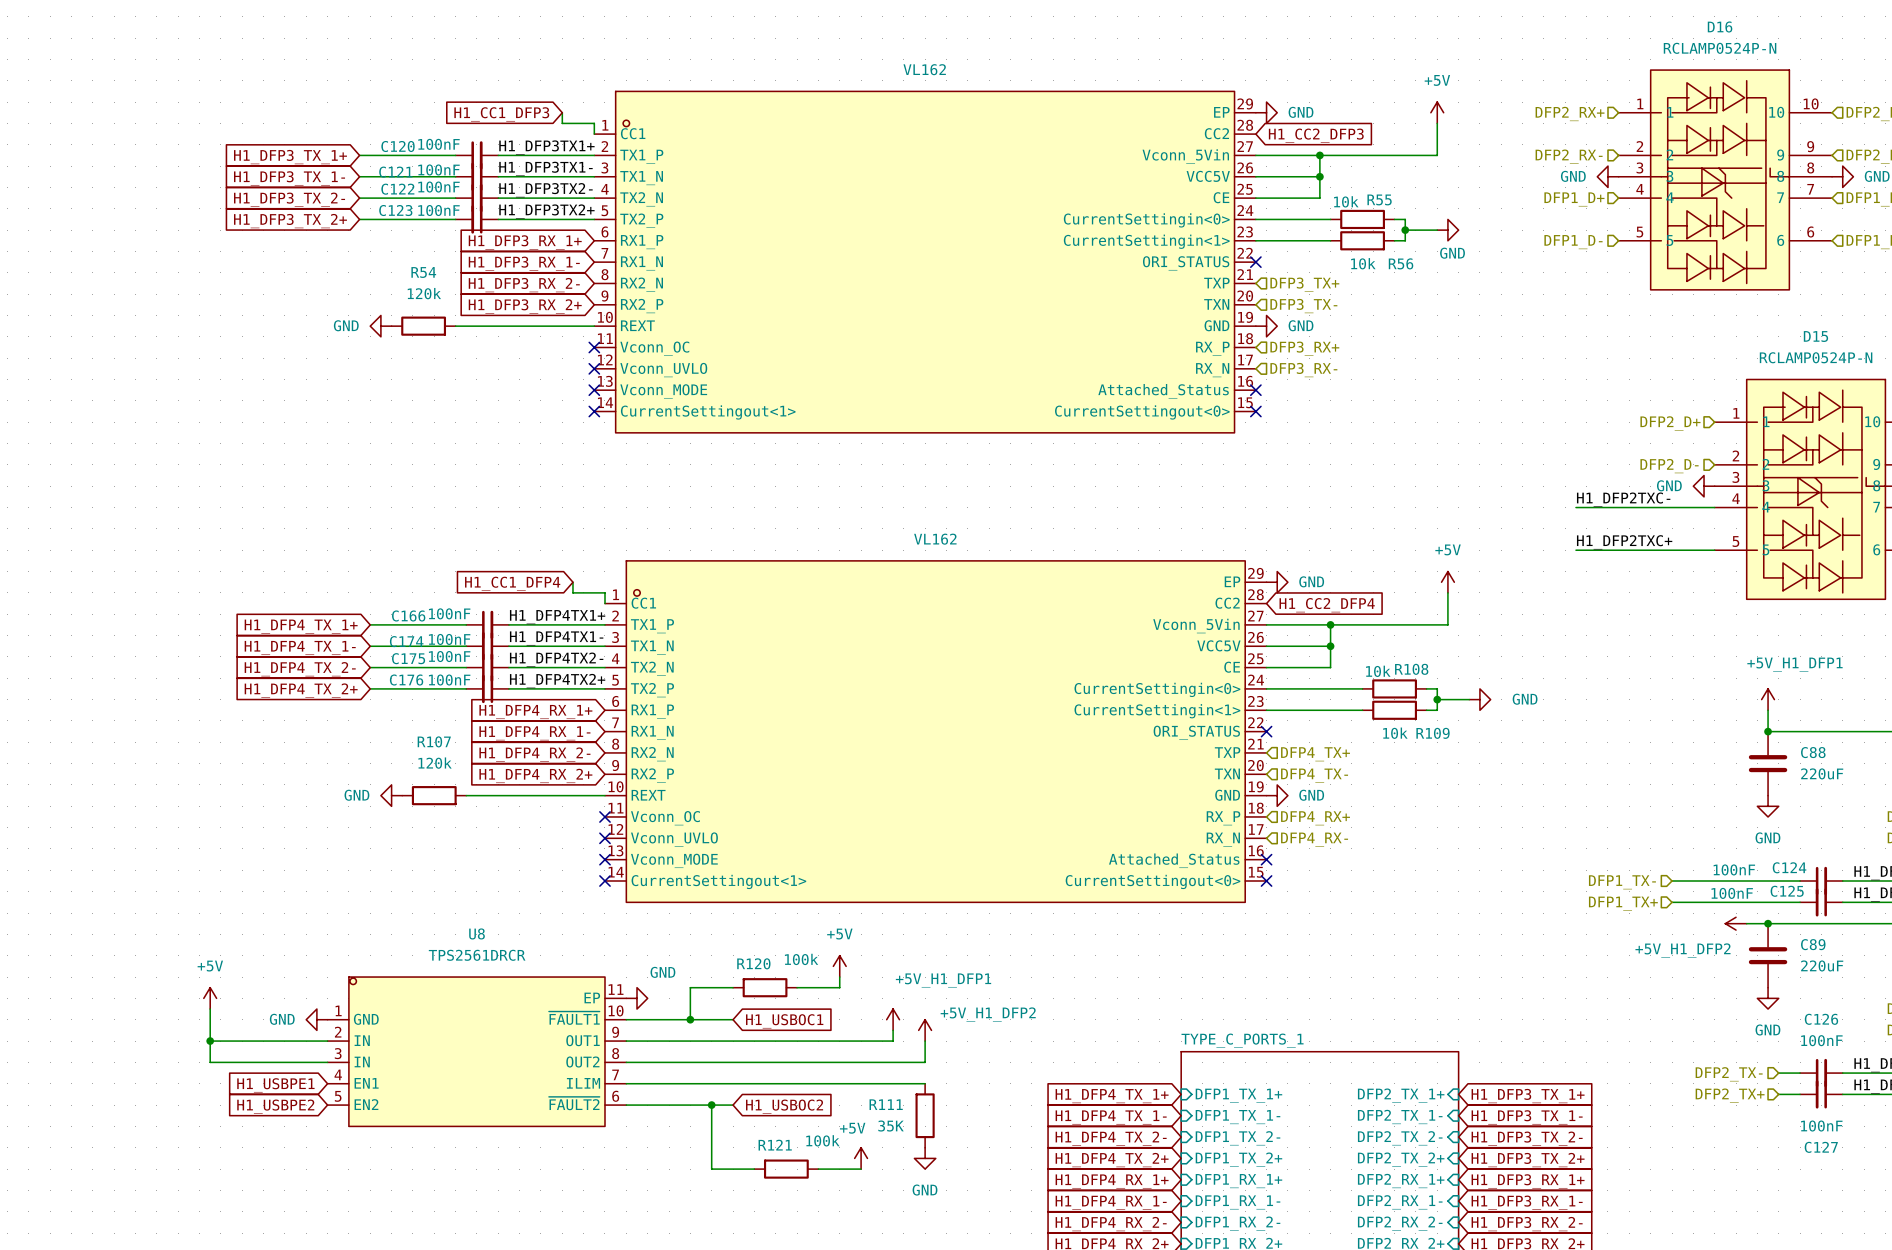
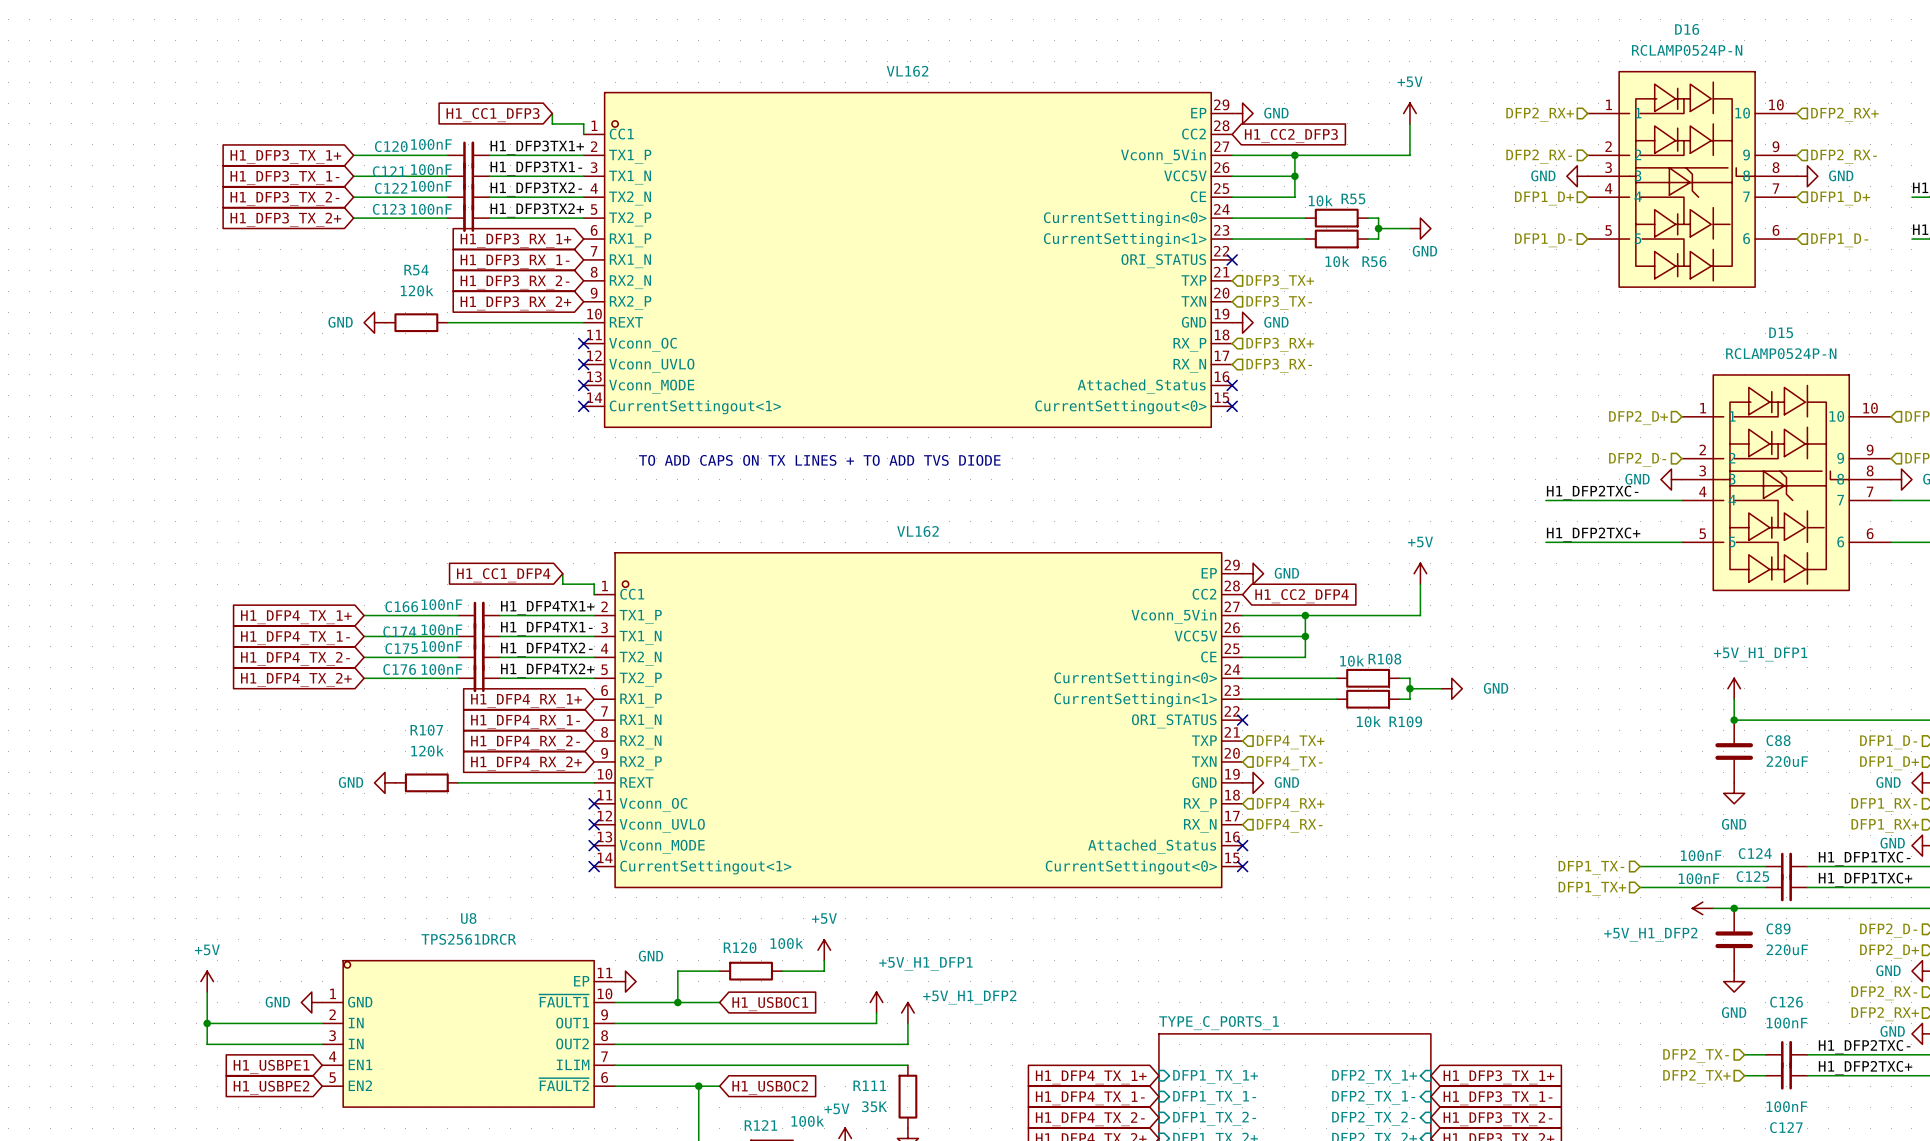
text: none -> TO ADD CAPS ON TX LINES + TO ADD TVS DIODE (819, 460)

